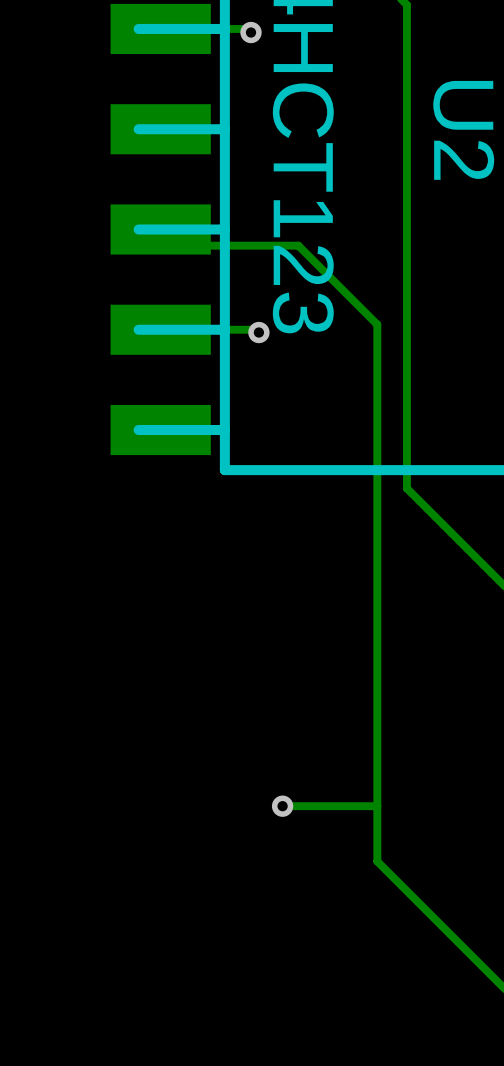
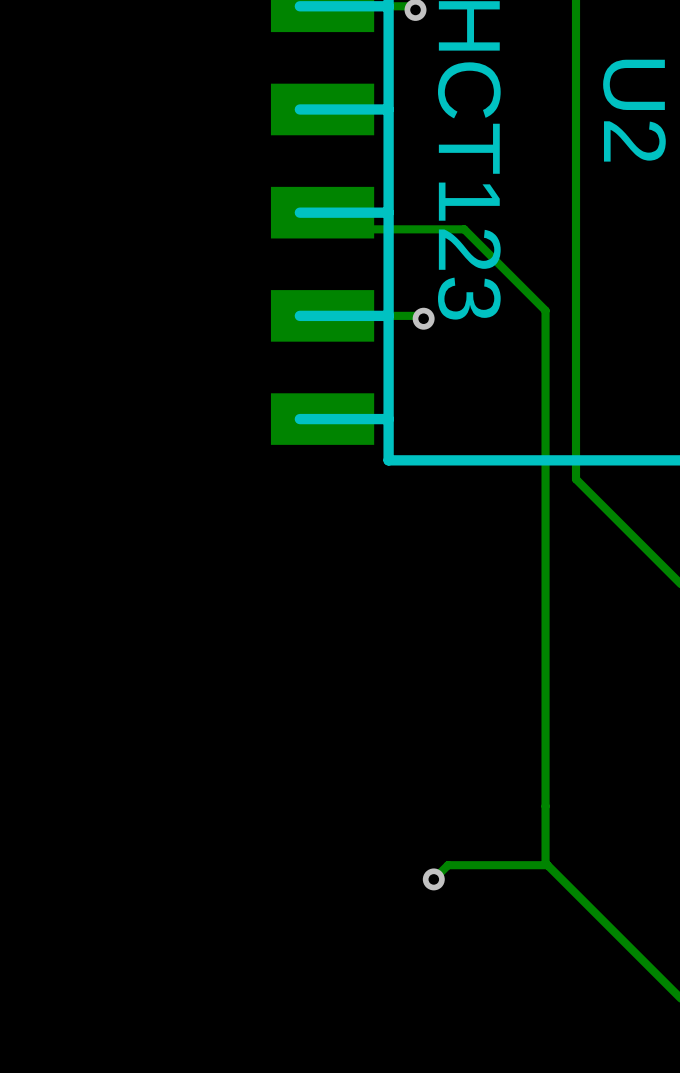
via position: (282, 806) -> (433, 879)
track: (377, 806) (282, 806) -> none
track: none -> (547, 865) (448, 865) (433, 879)

